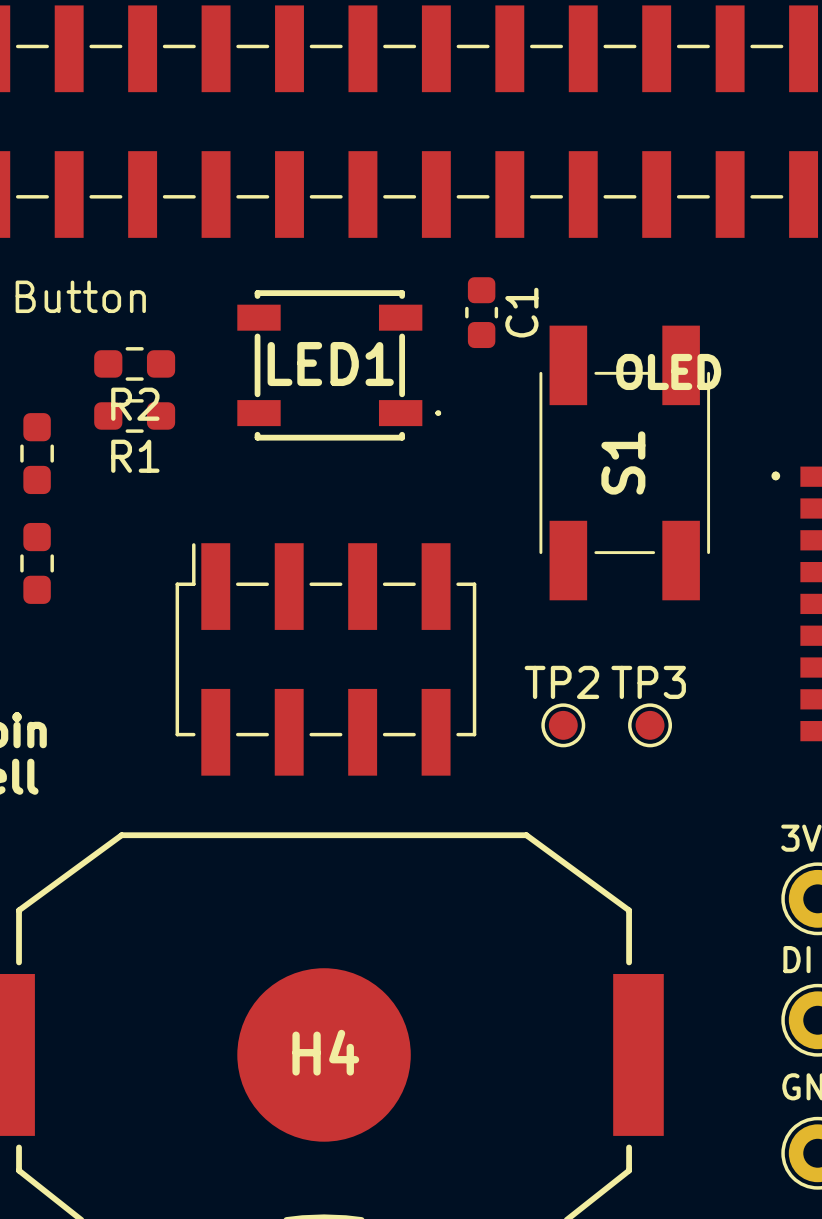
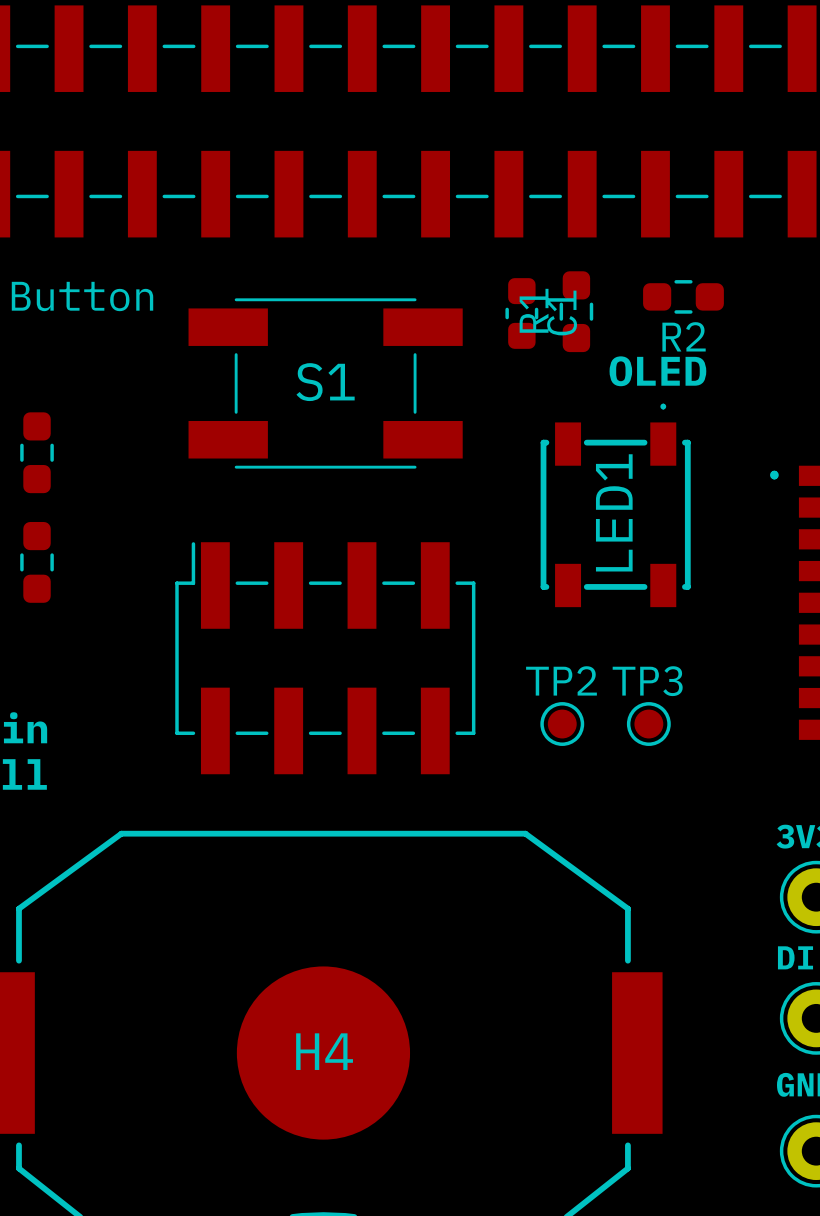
C1 position: (481, 312) -> (521, 313)
R2 position: (134, 363) -> (683, 296)
LED1 rotation: 0° (339, 365) -> 90° counterclockwise (615, 505)
LED1 position: (339, 365) -> (615, 505)
R1 rotation: 0° (134, 415) -> 90° clockwise (576, 311)
R1 position: (134, 415) -> (576, 311)
S1 rotation: 0° (624, 462) -> 90° clockwise (325, 383)
S1 position: (624, 462) -> (325, 383)

